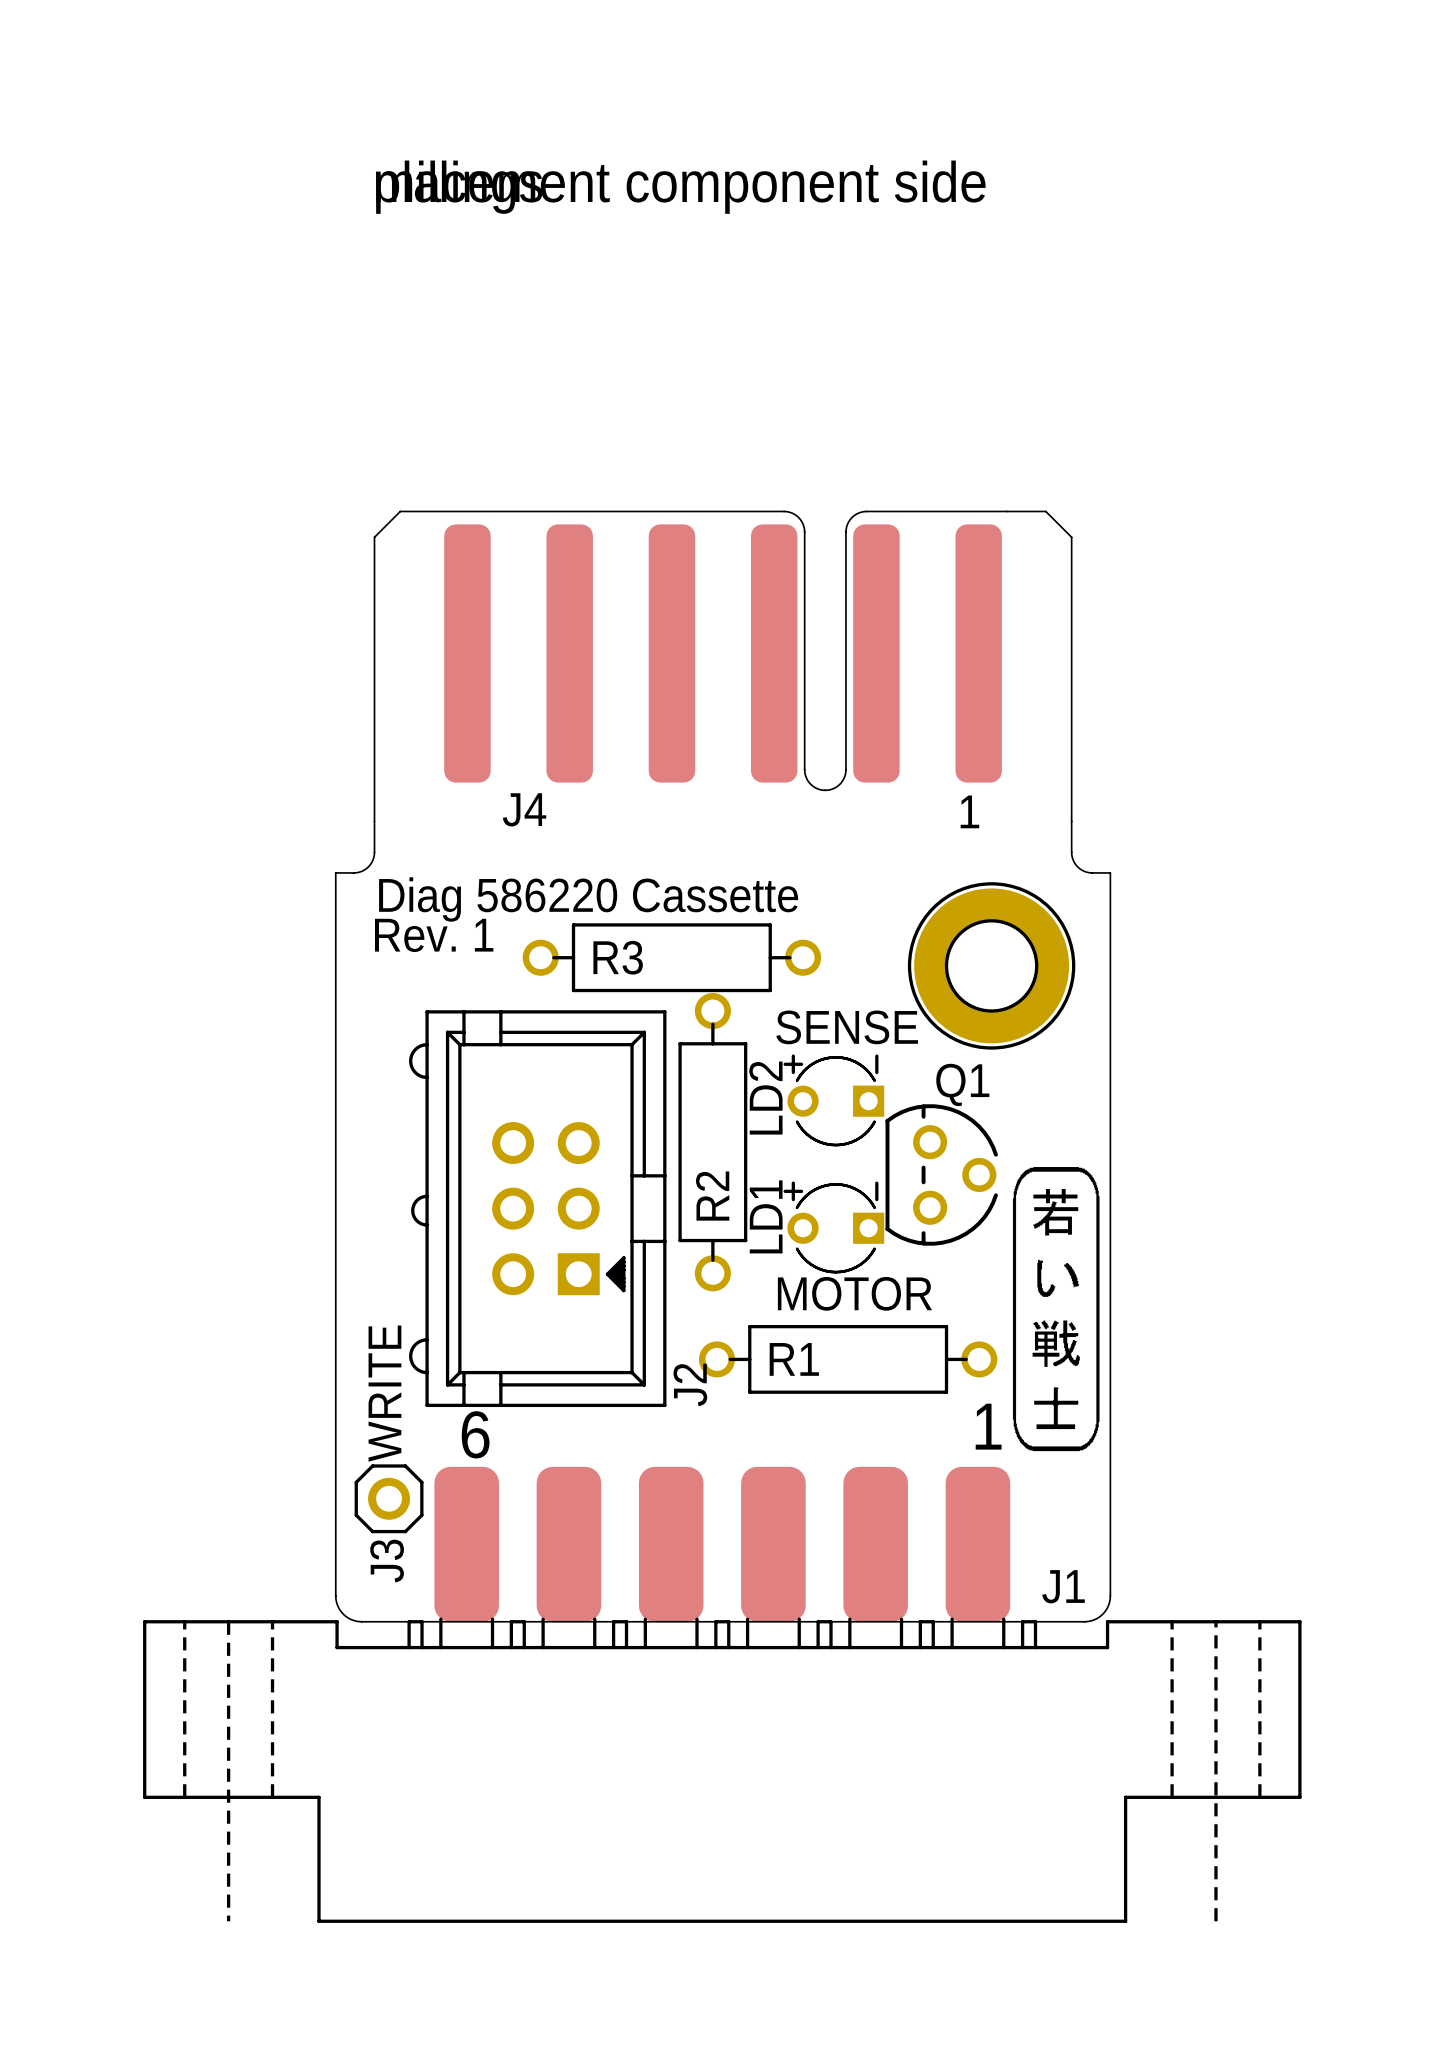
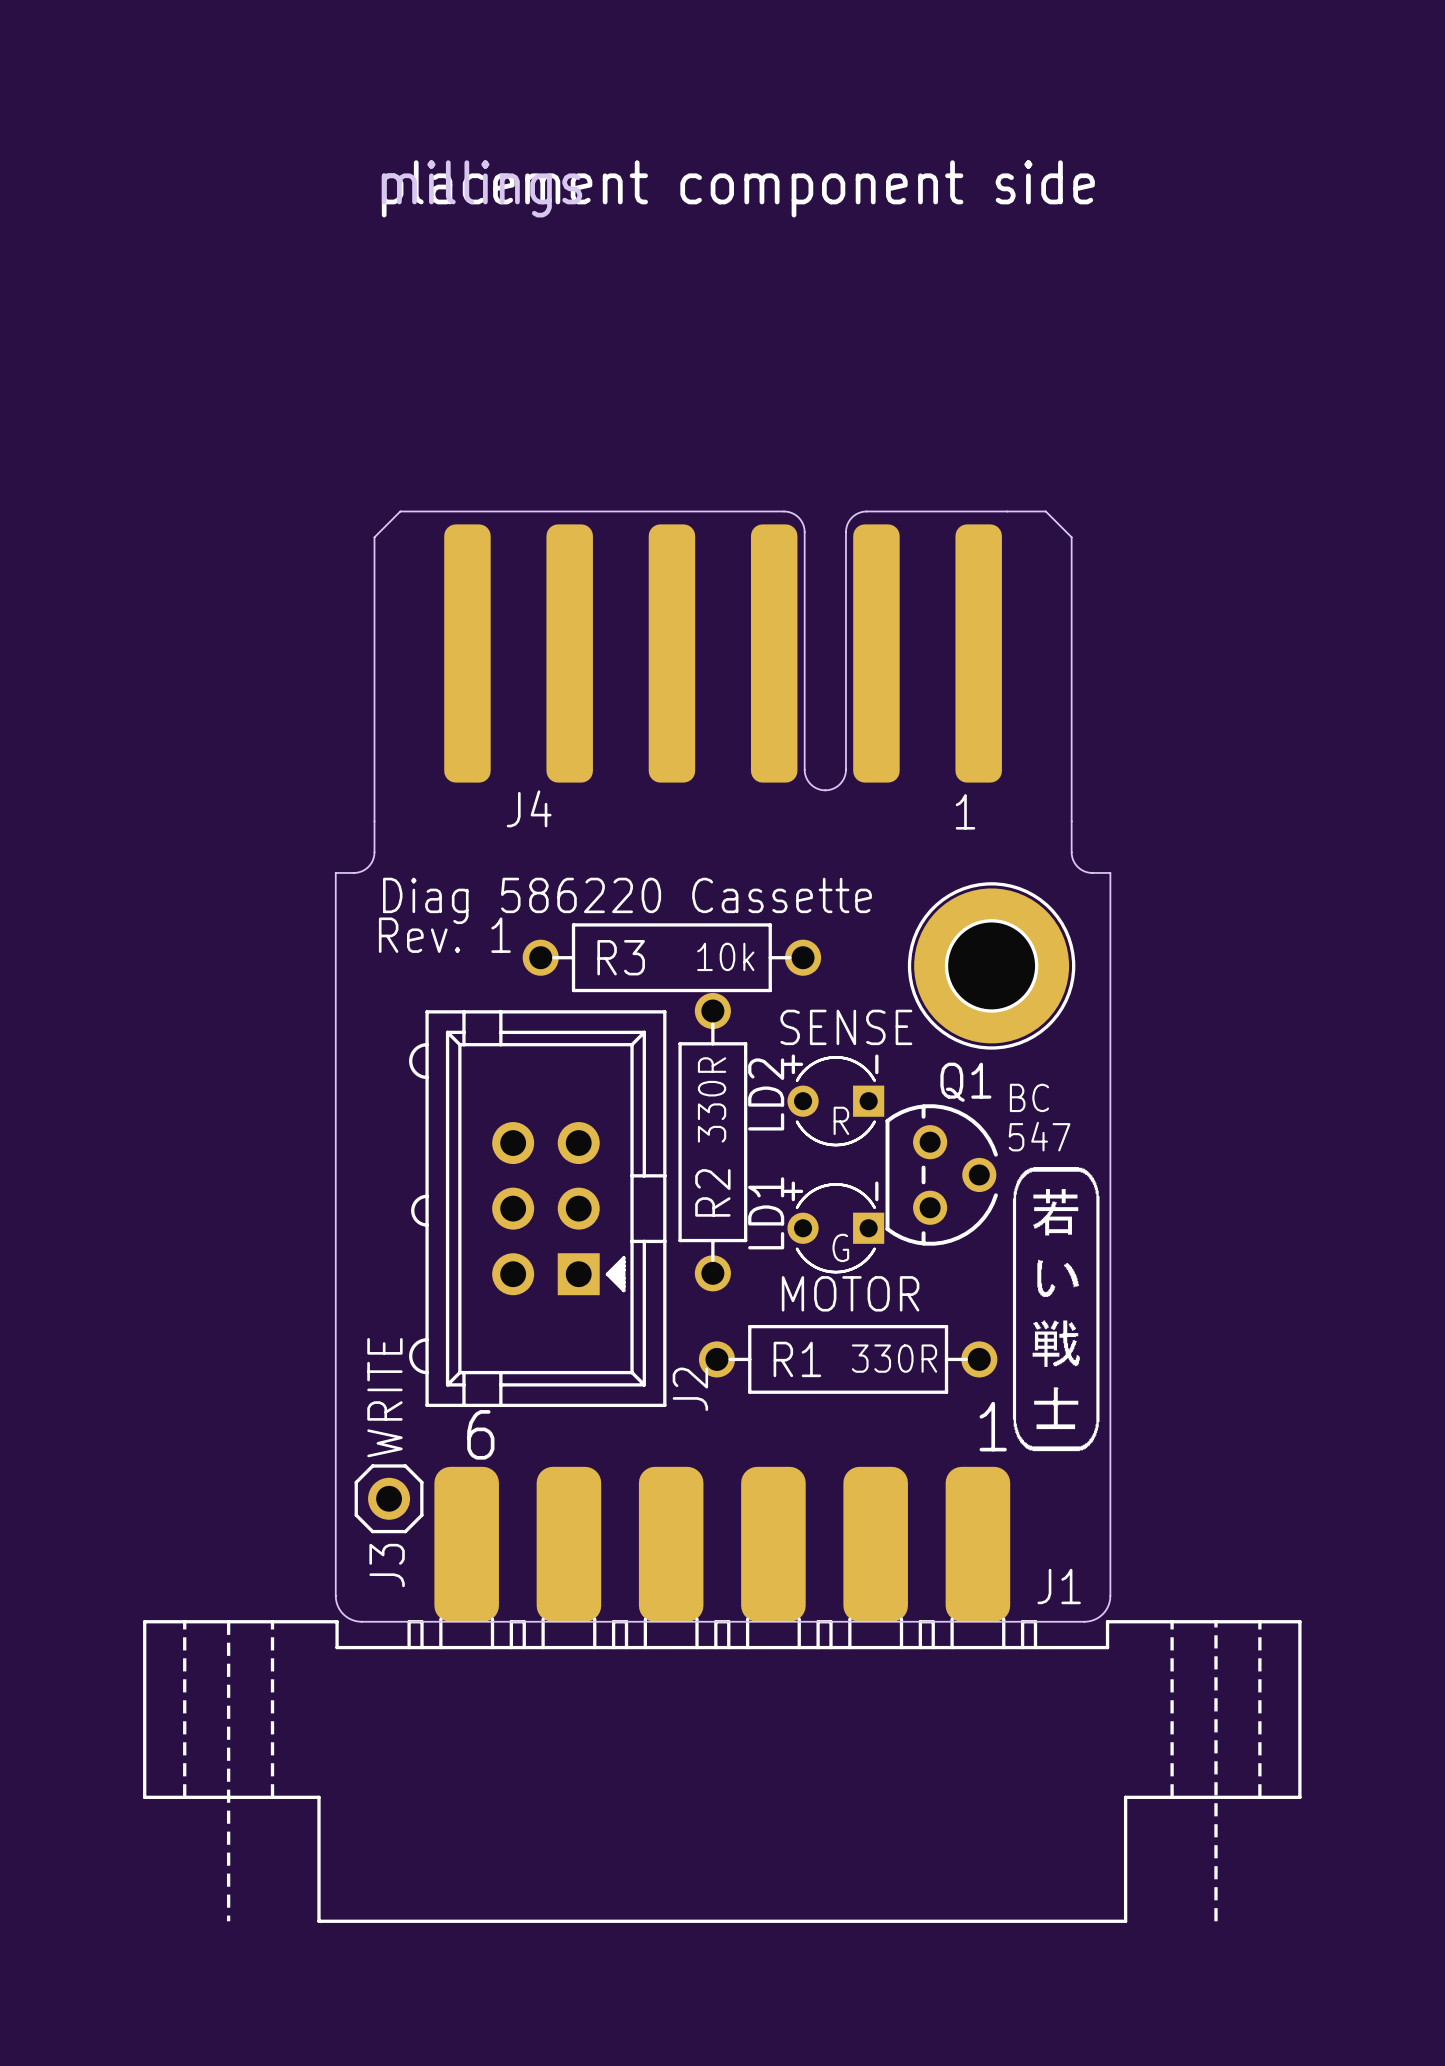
text: none -> 10k (725, 956)
text: none -> BC (1029, 1097)
text: none -> 330R (712, 1099)
text: none -> R (841, 1120)
text: none -> 547 (1039, 1136)
text: none -> G (840, 1247)
text: none -> 330R (894, 1358)

